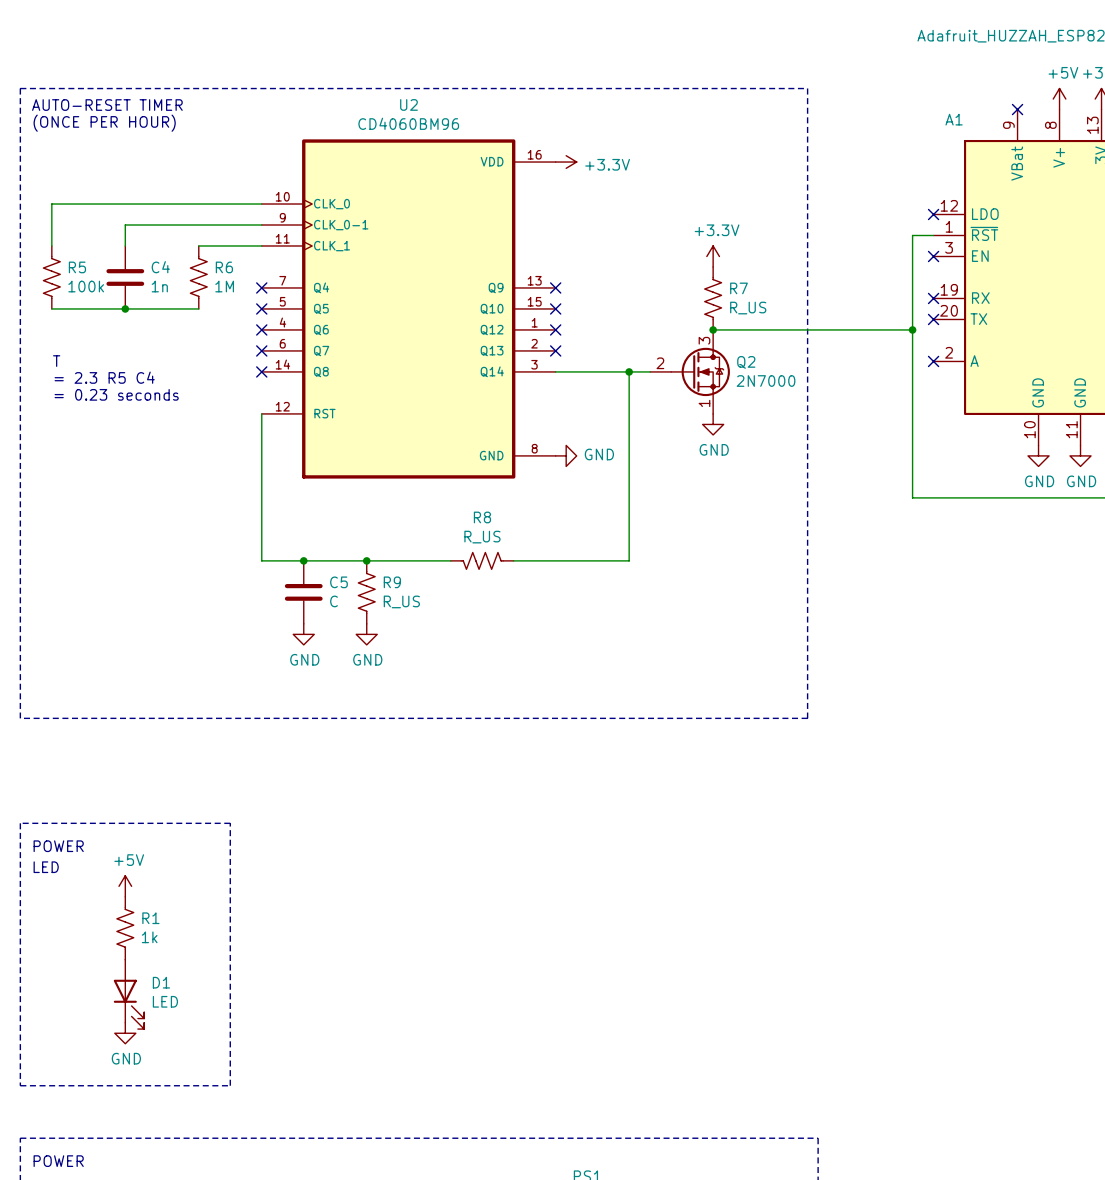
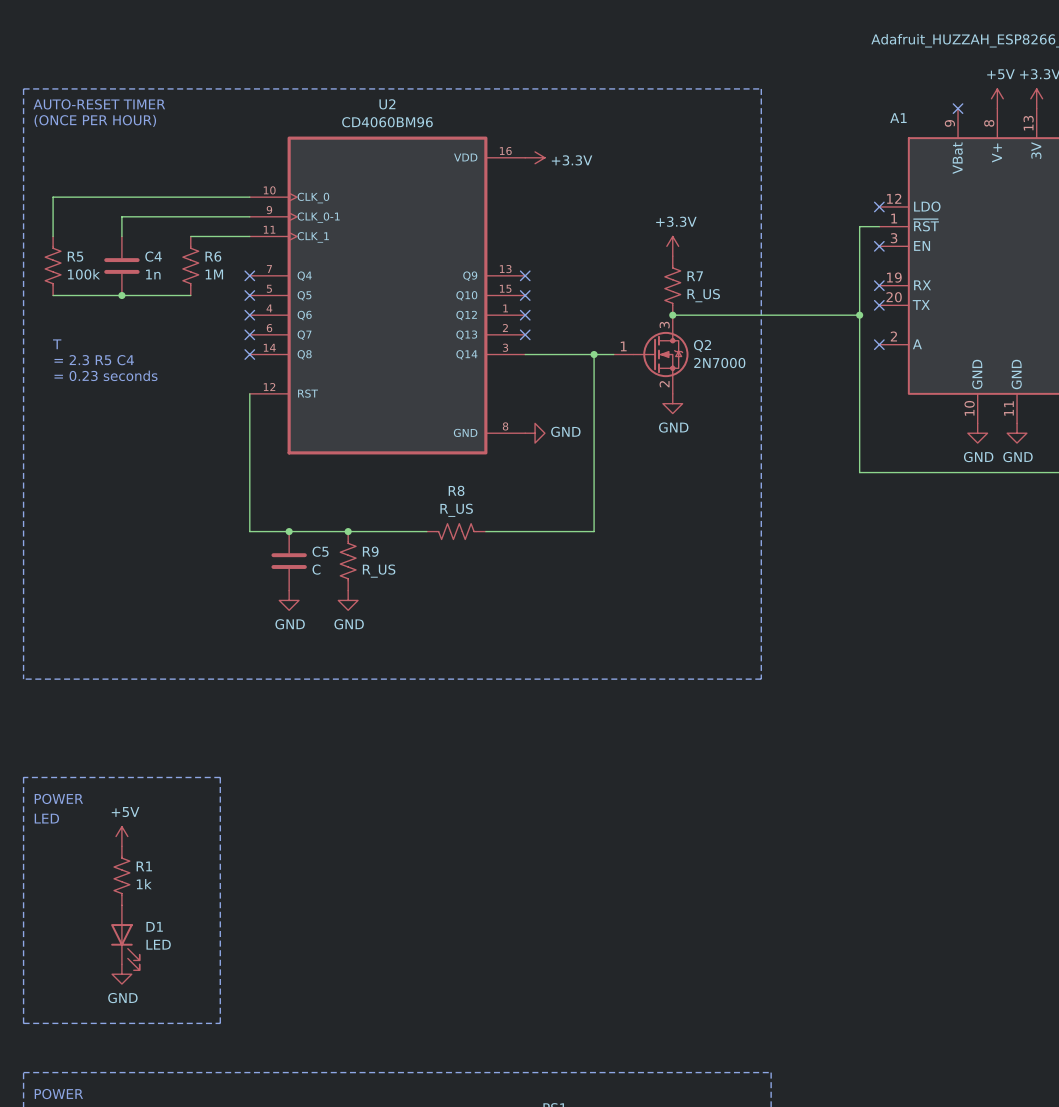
Q2 pin number: 2 (660, 363) -> 1 (623, 346)
Q2 pin number: 1 (704, 403) -> 2 (664, 384)

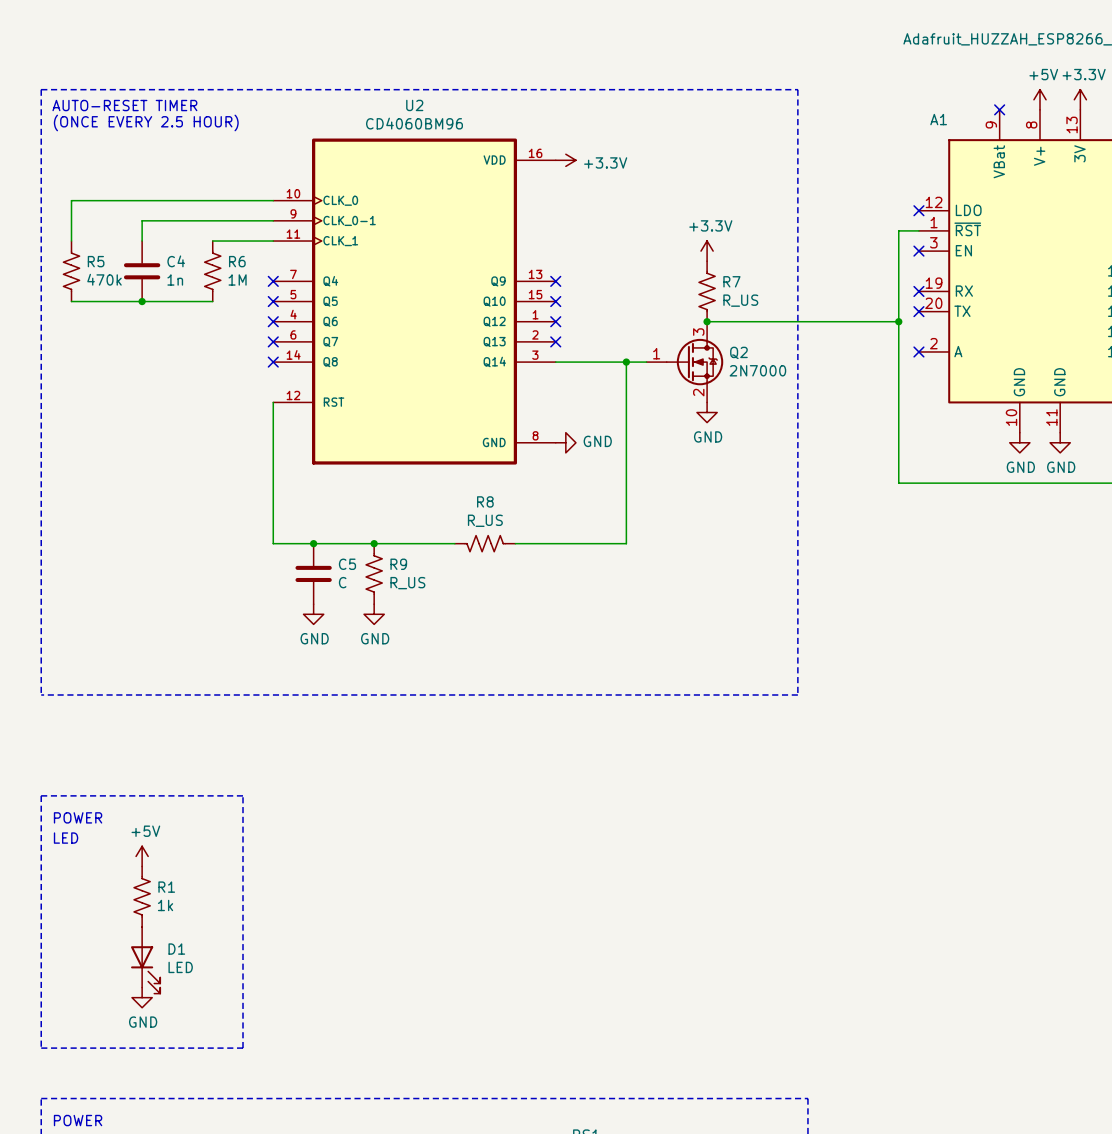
text: (ONCE PER HOUR) (95, 120) -> (ONCE EVERY 2.5 HOUR) (146, 122)
R5 value: 100k (83, 274) -> 470k (104, 279)
text: T (57, 344) -> none
text: = 2.3 R5 C4 (94, 360) -> none
text: = 0.23 seconds (105, 375) -> none

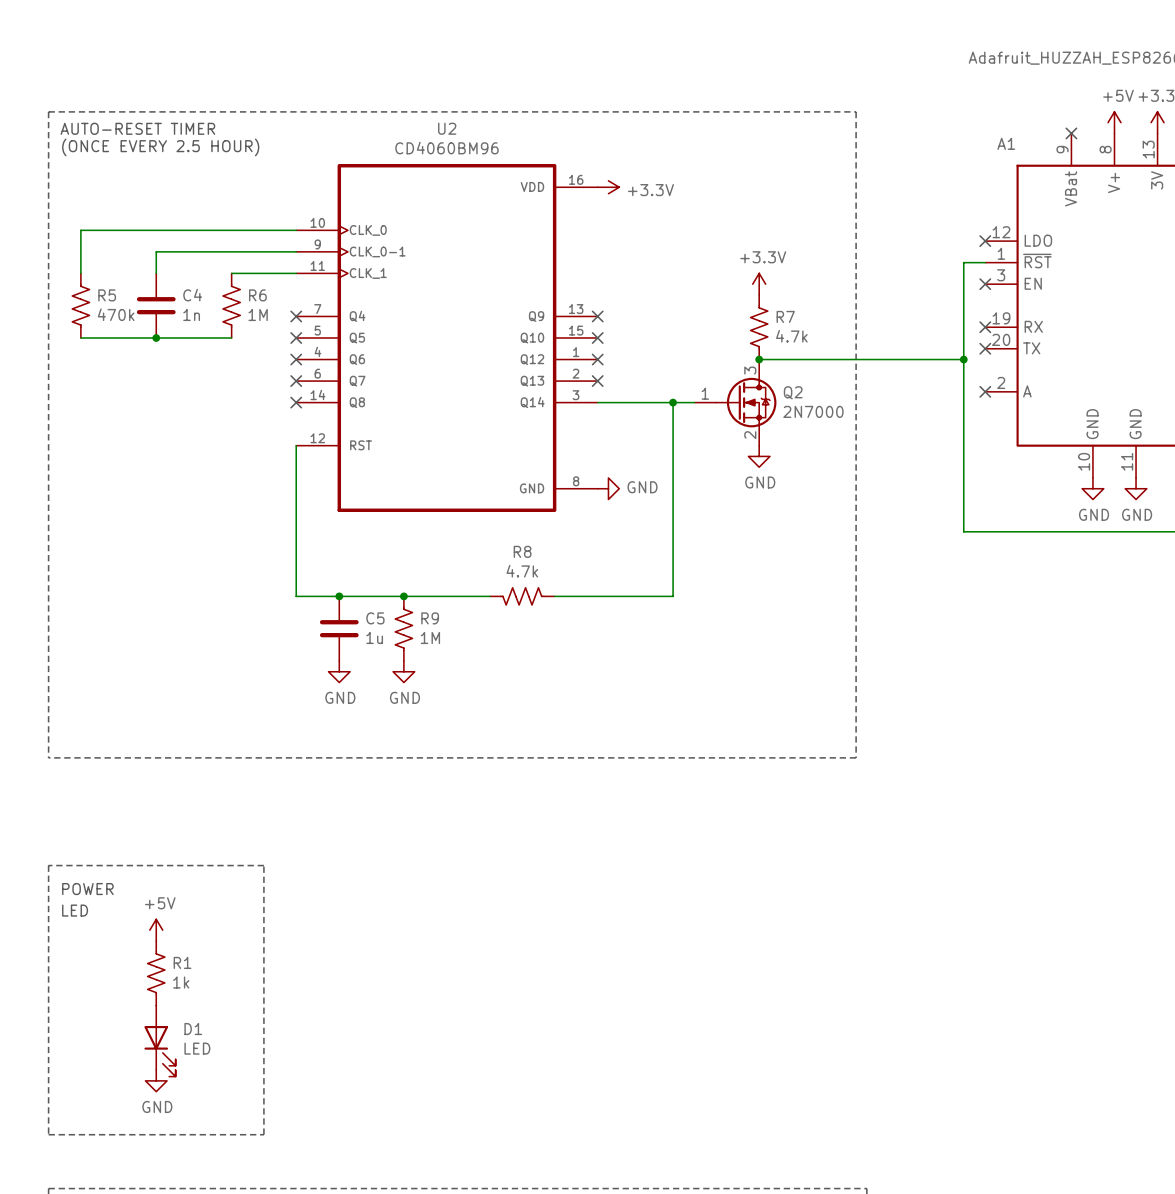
R7 value: R_US (740, 300) -> 4.7k (791, 336)
R8 value: R_US (485, 520) -> 4.7k (522, 571)
C5 value: C (342, 582) -> 1u (374, 637)
R9 value: R_US (407, 583) -> 1M (430, 637)

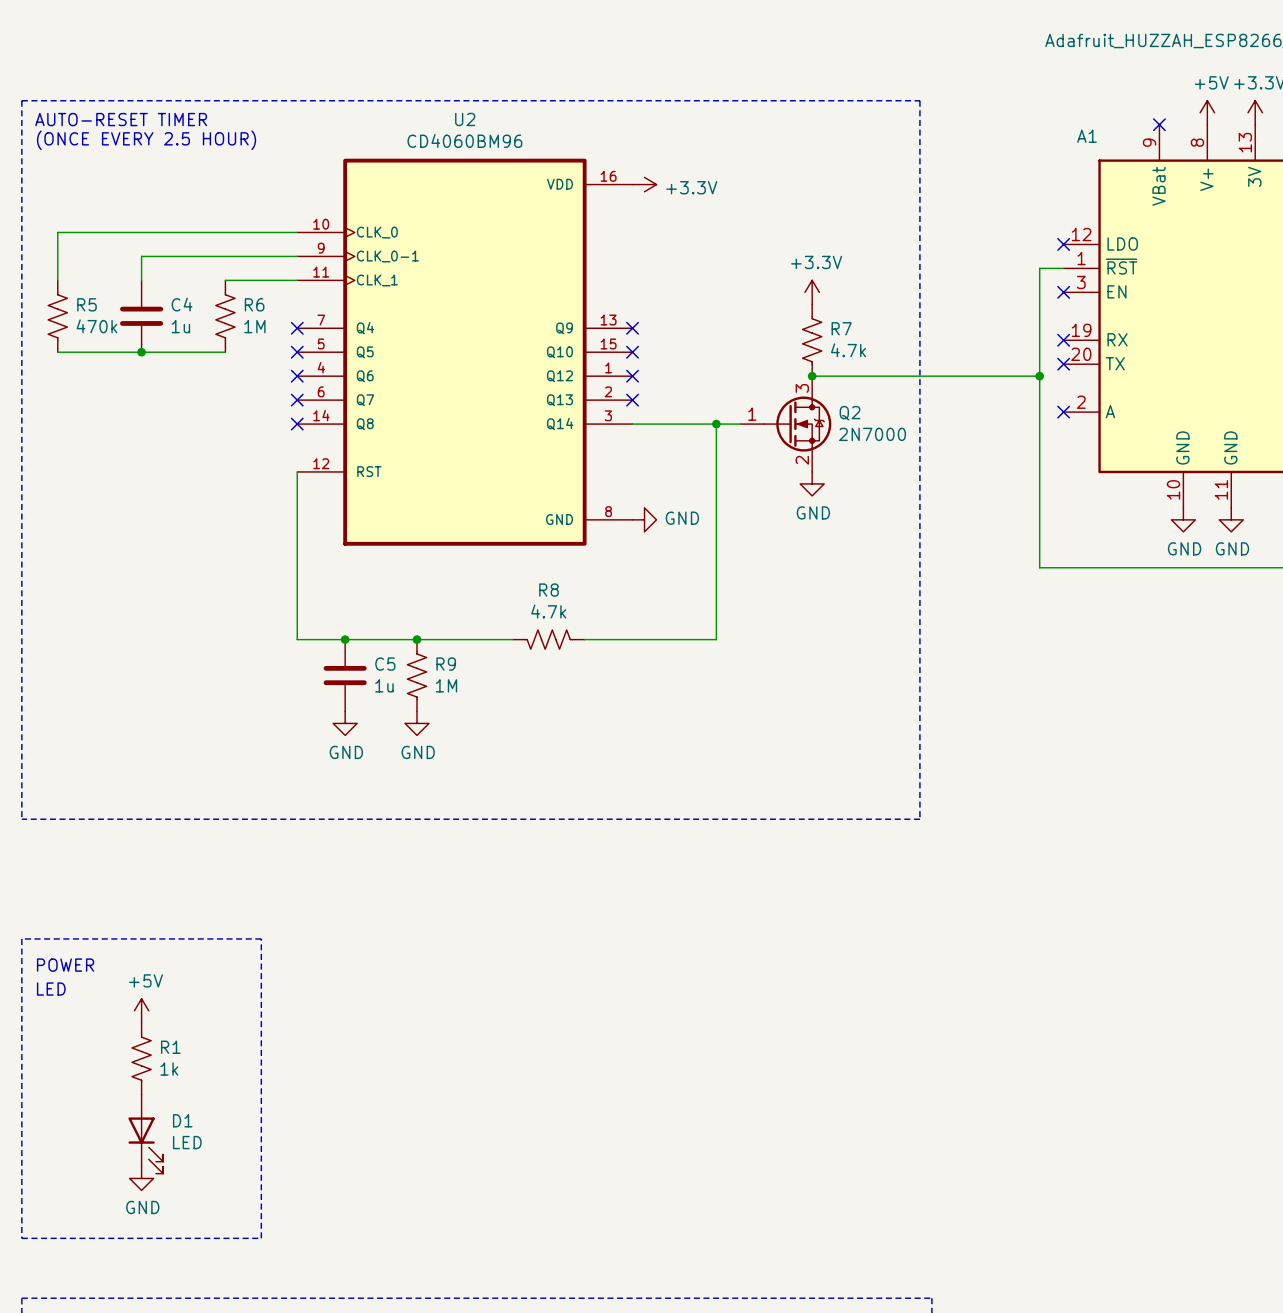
C4 value: 1n (191, 314) -> 1u (180, 326)

